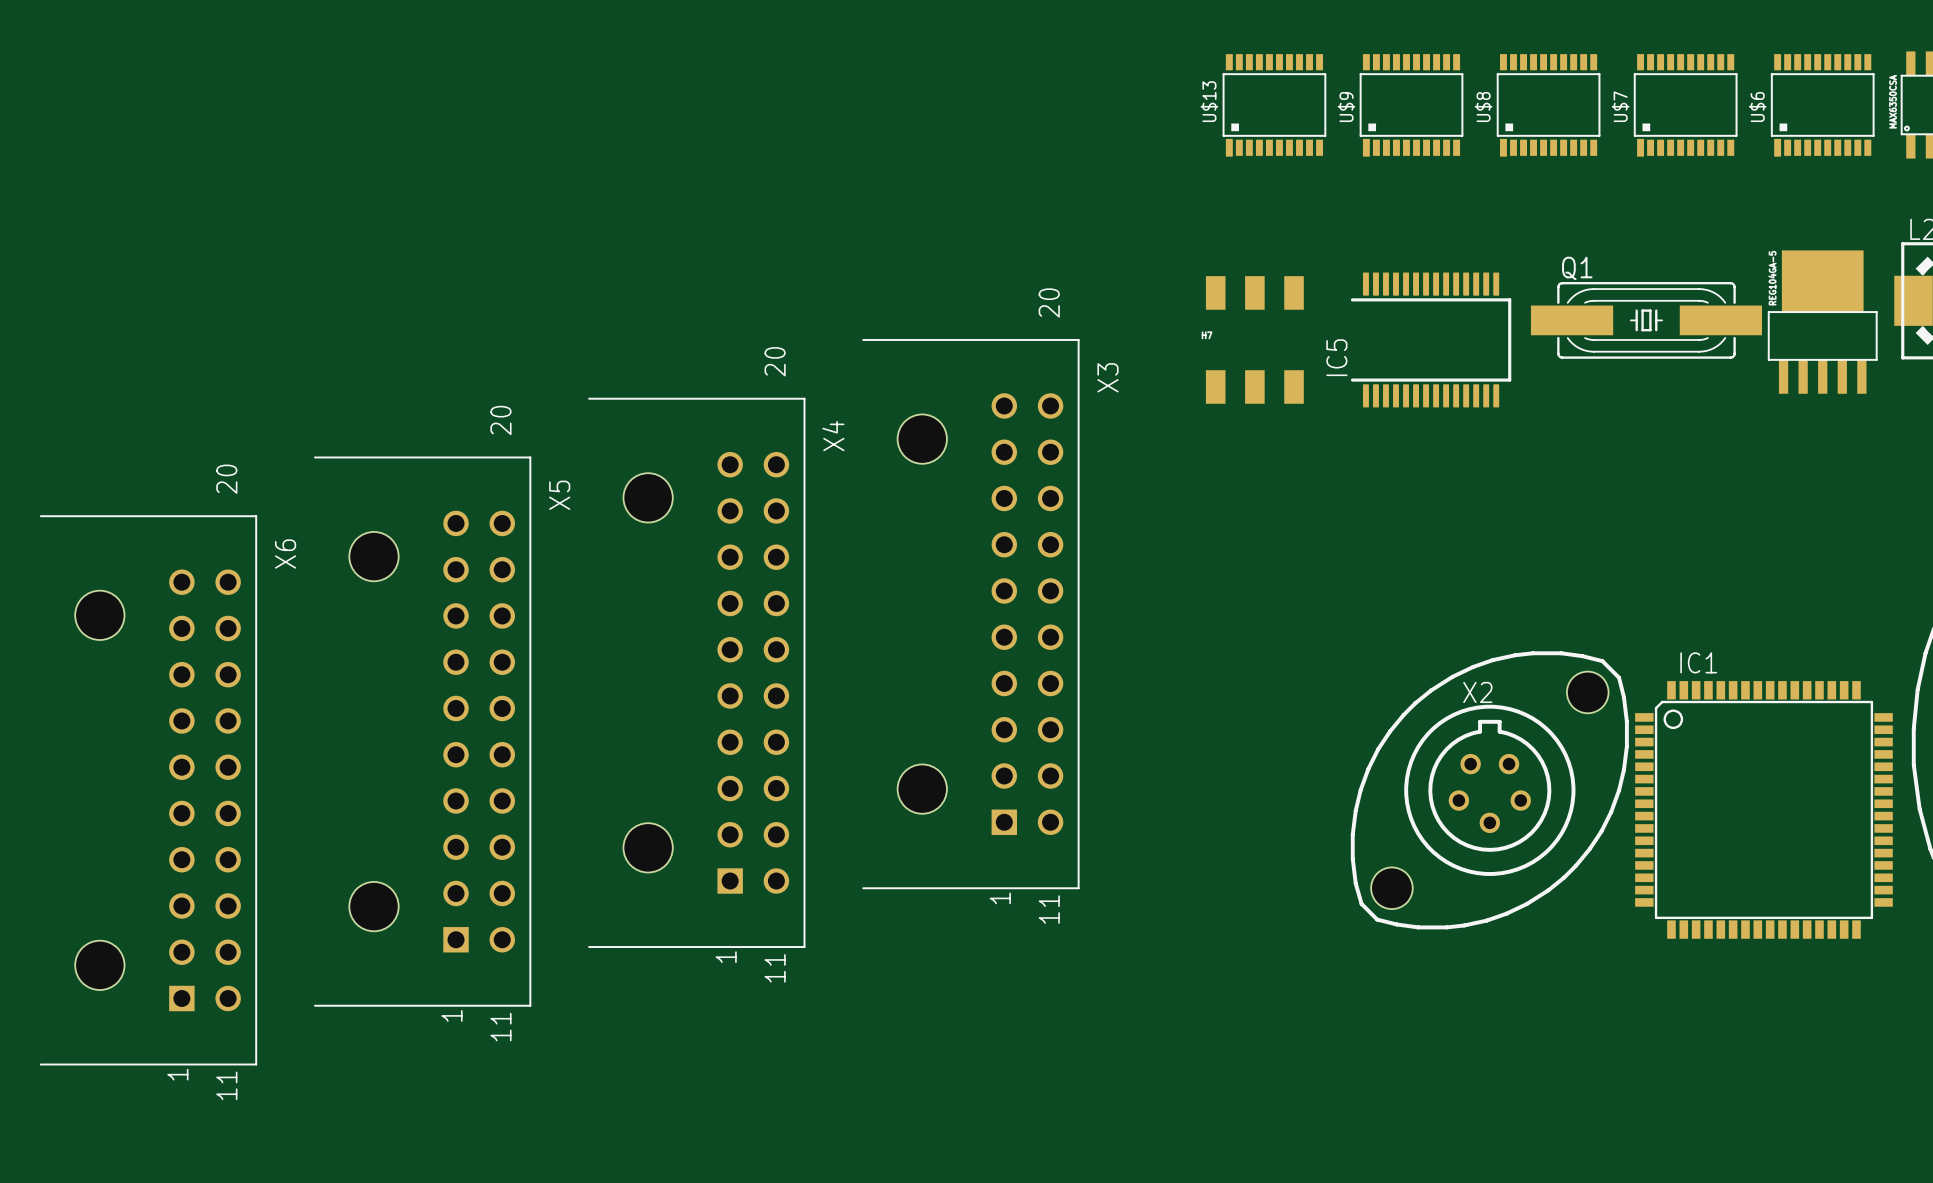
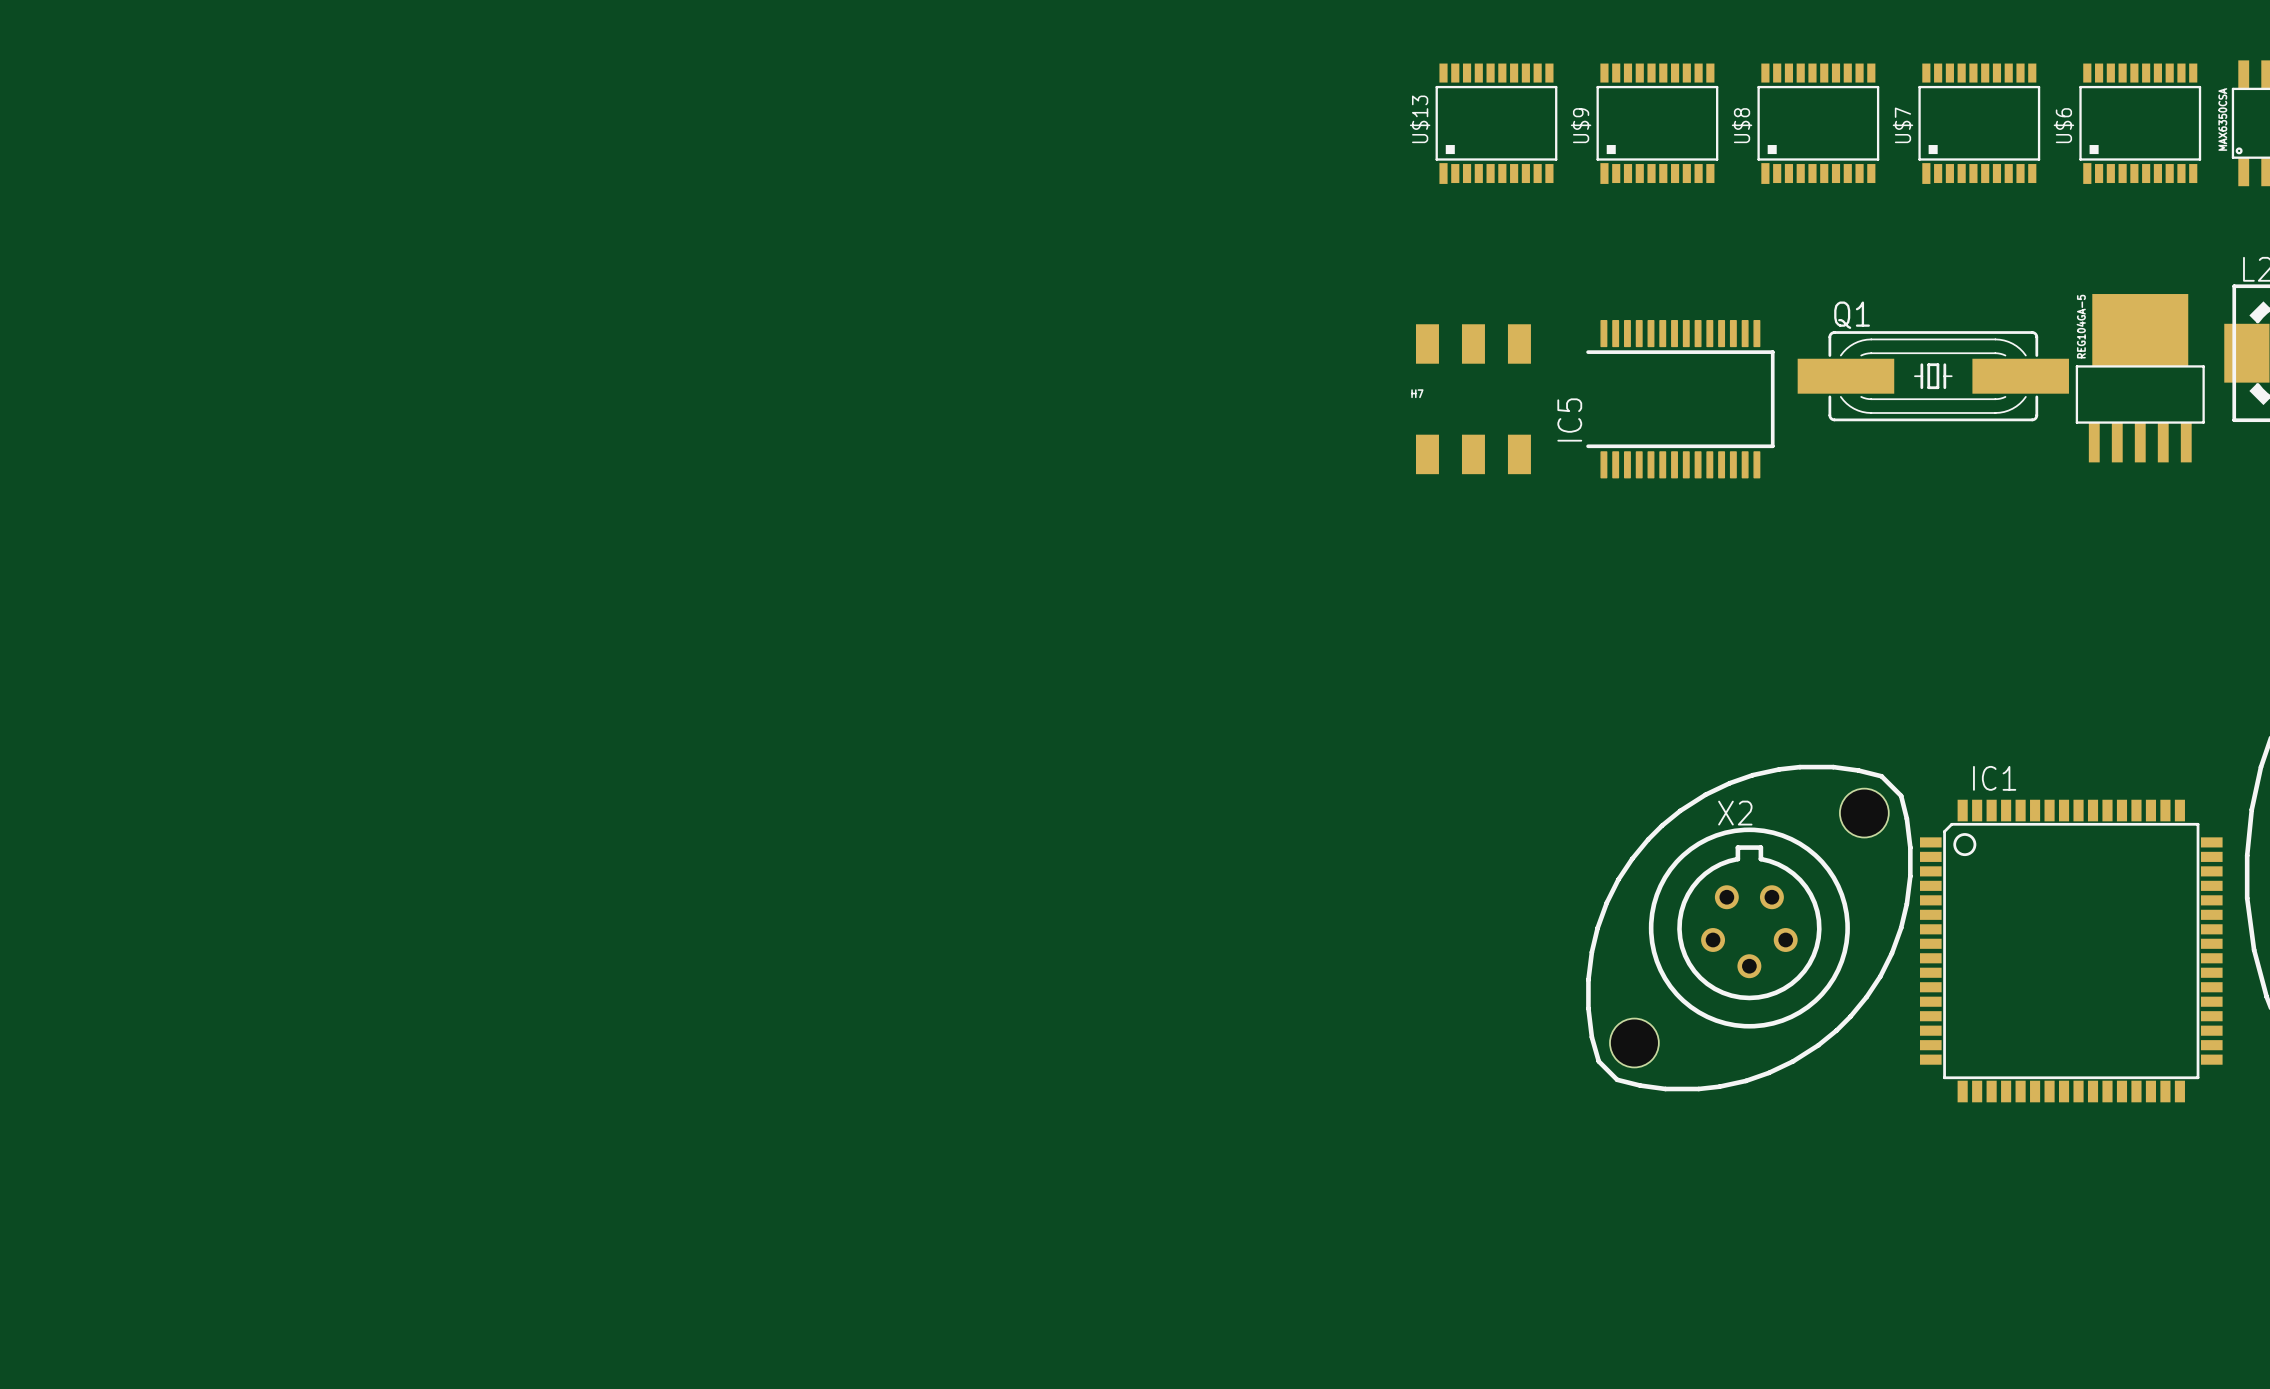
X3: (970, 614) -> none
X4: (696, 672) -> none
X5: (422, 731) -> none
X6: (148, 790) -> none

